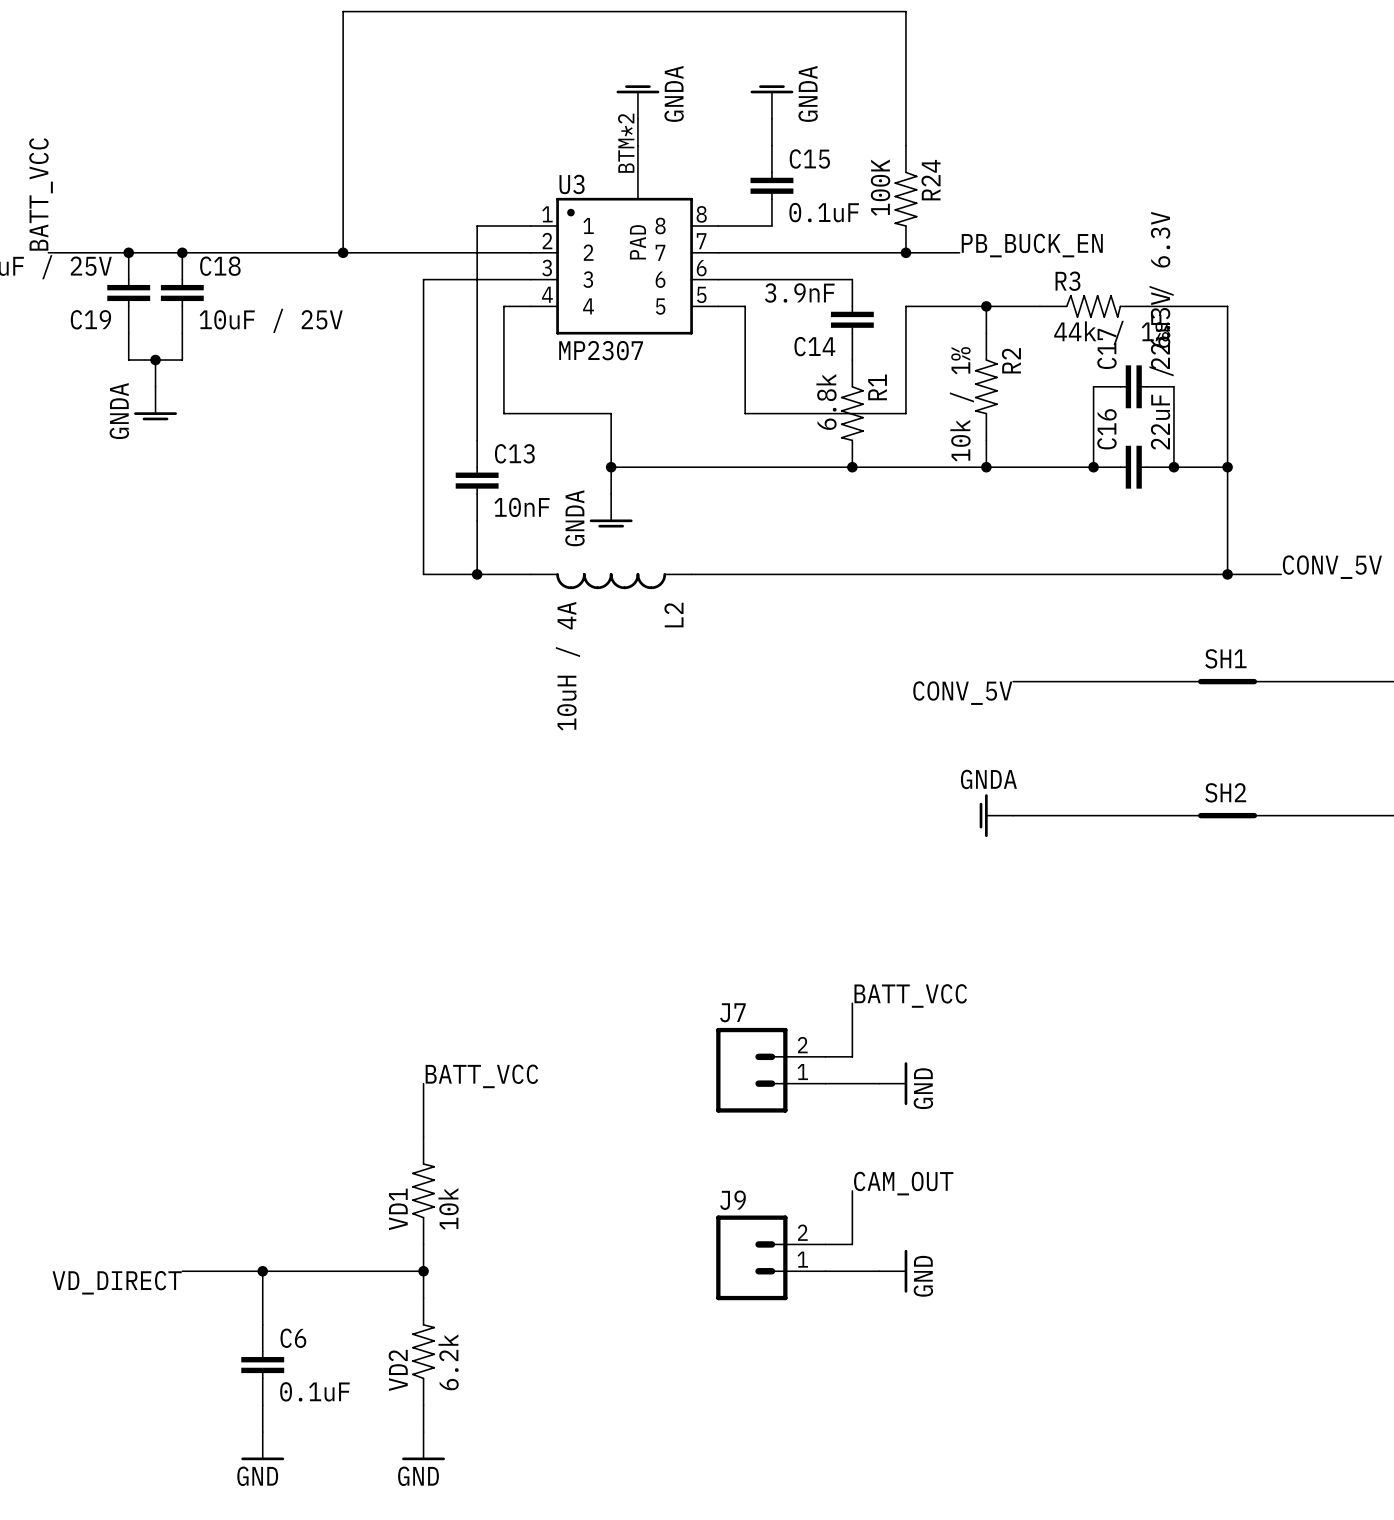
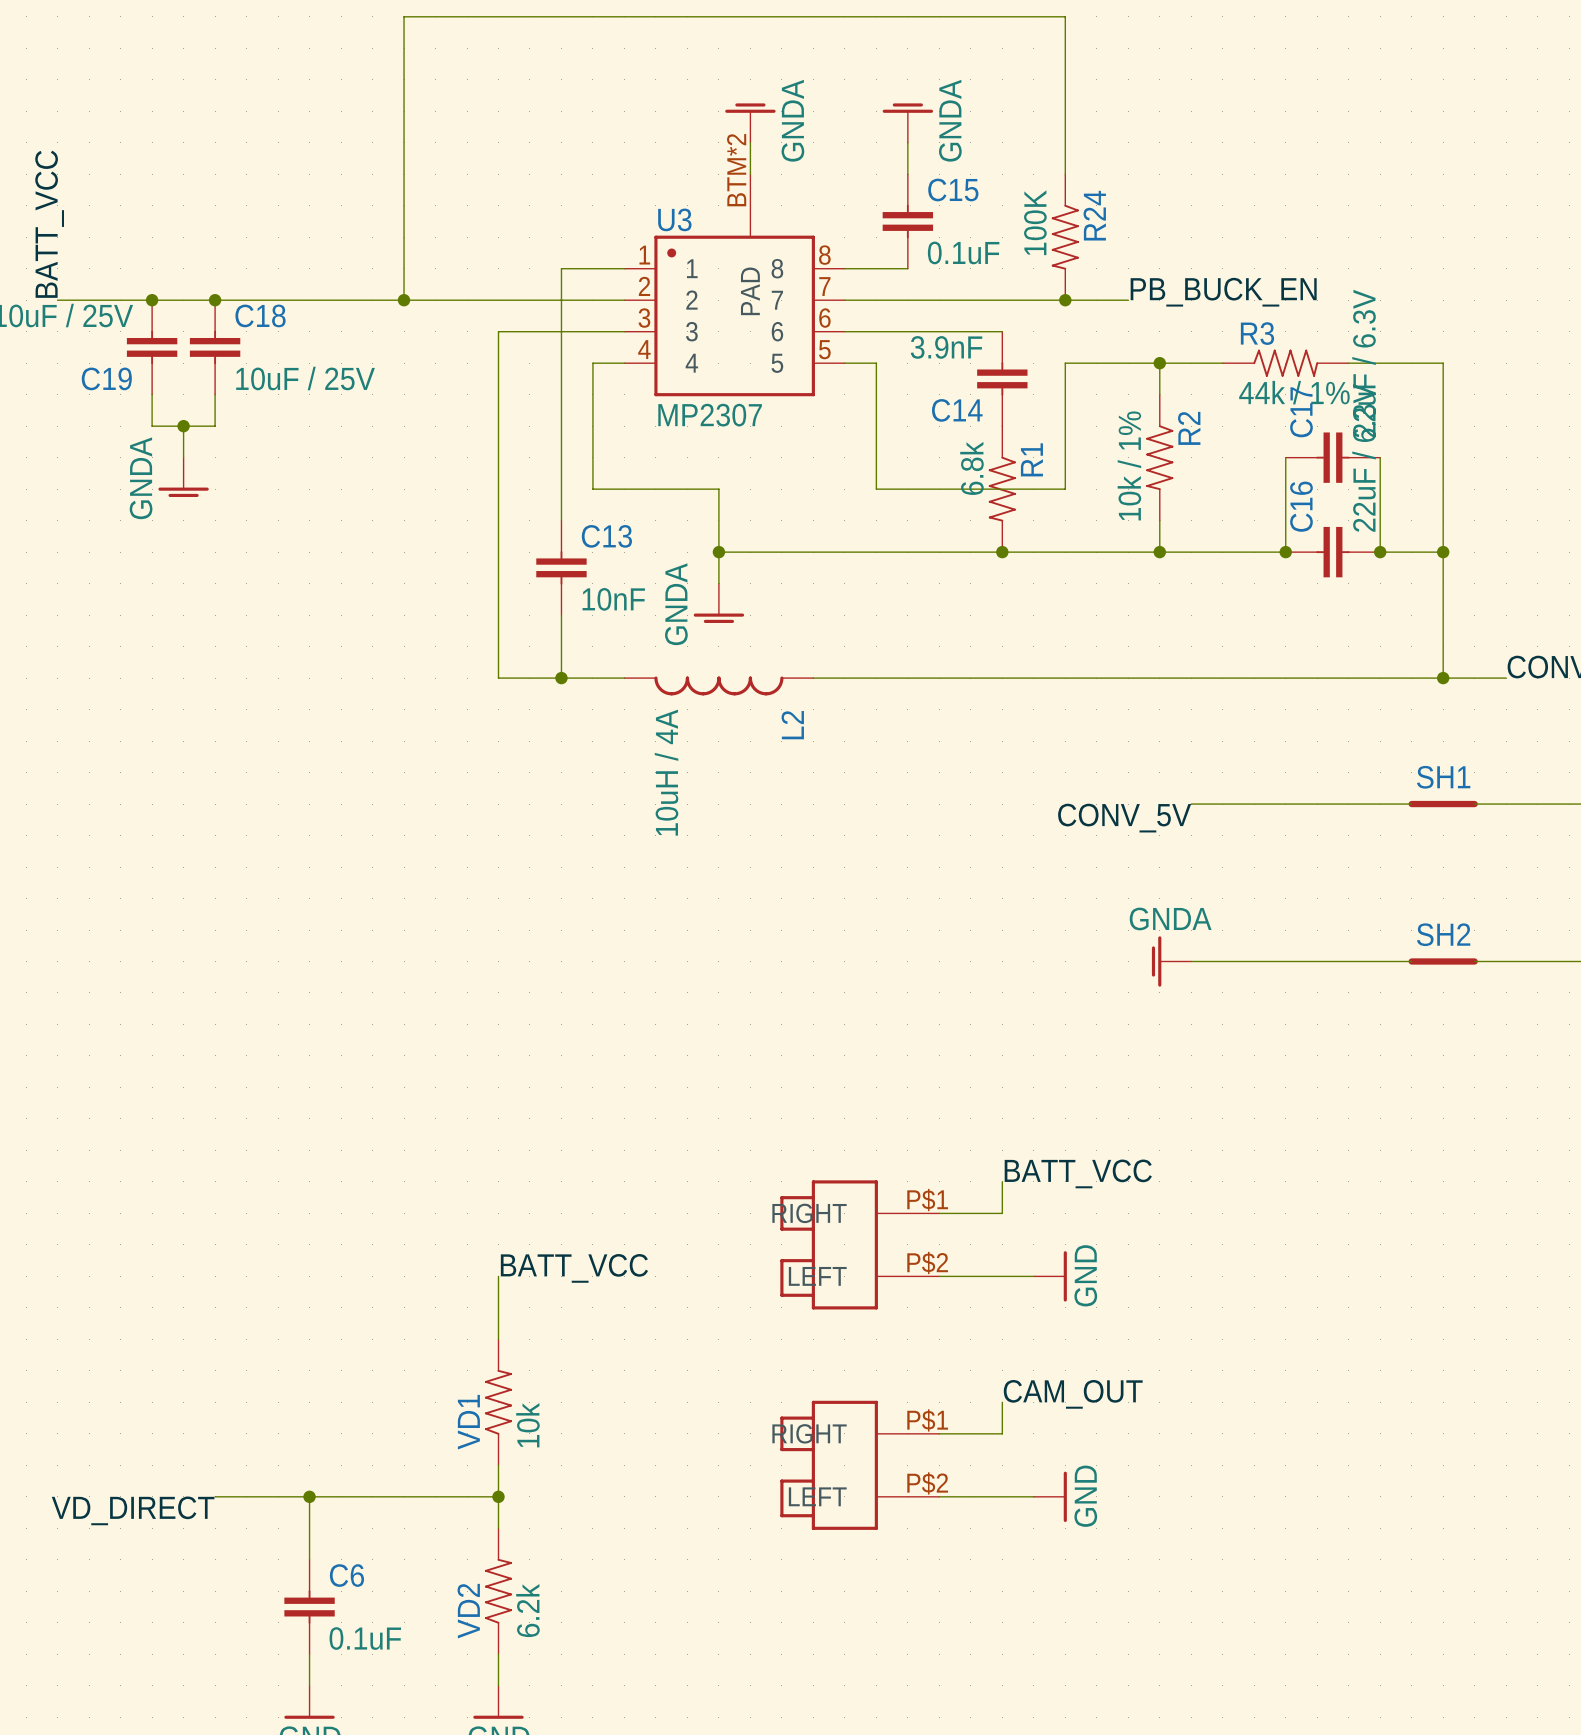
wire: (852, 1030) (852, 1056) (825, 1056) -> (1002, 1213) (939, 1213)
part: none -> (859, 1244)
J7: (770, 1070) -> none
wire: (852, 1217) (852, 1244) (825, 1244) -> (1002, 1433) (939, 1433)
part: none -> (859, 1465)
J9: (770, 1257) -> none

